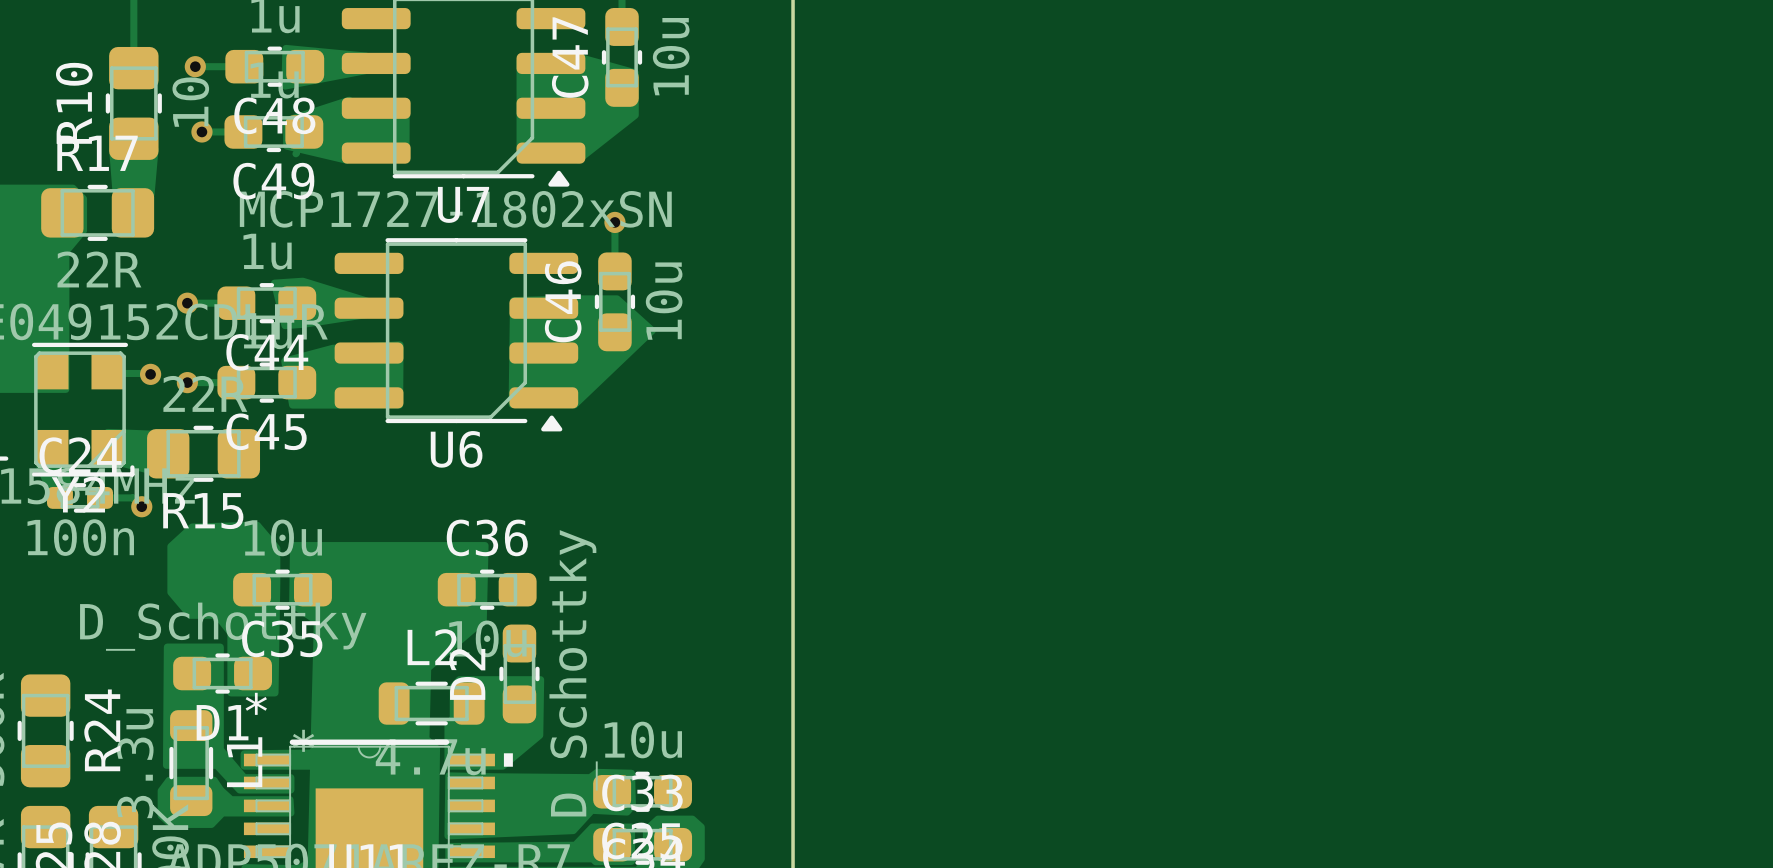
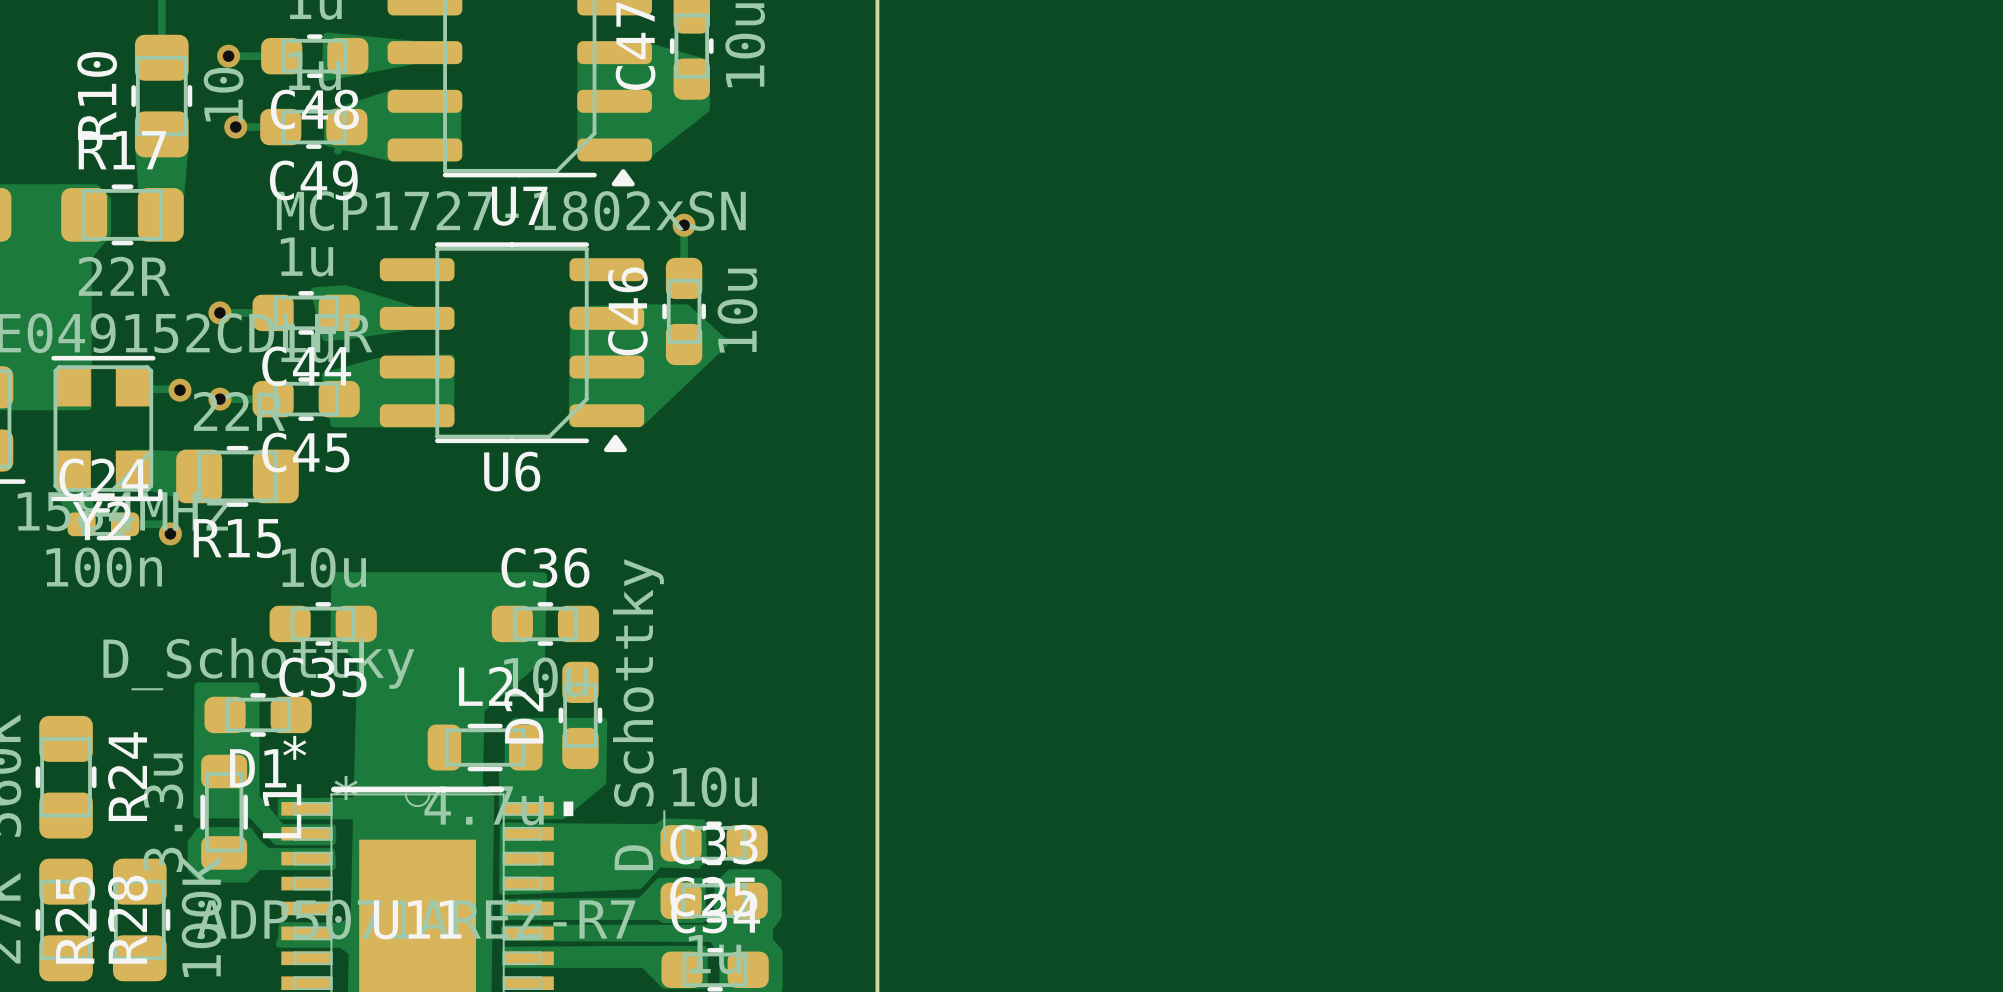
drawing: [167, 521, 281, 697] -> none

